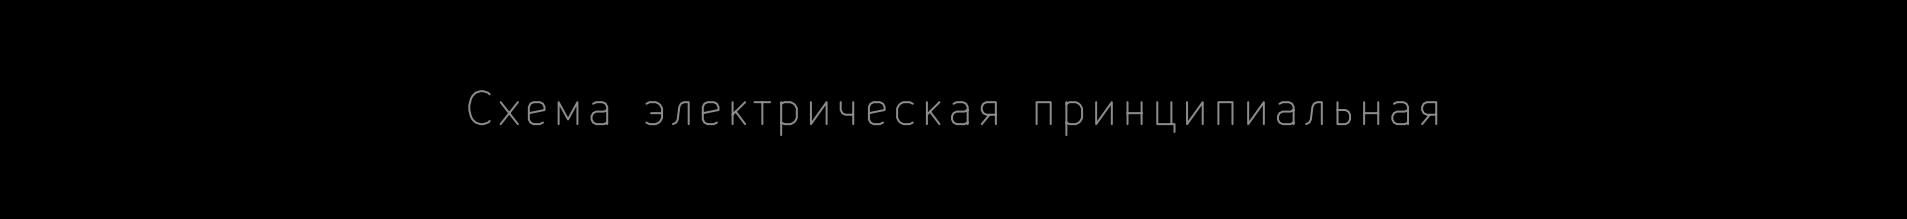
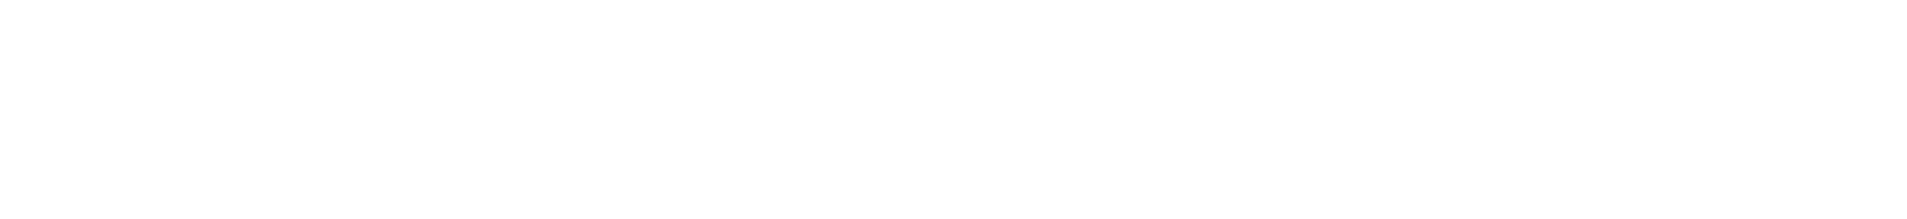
text: Схема электрическая принципиальная (952, 113) -> none

